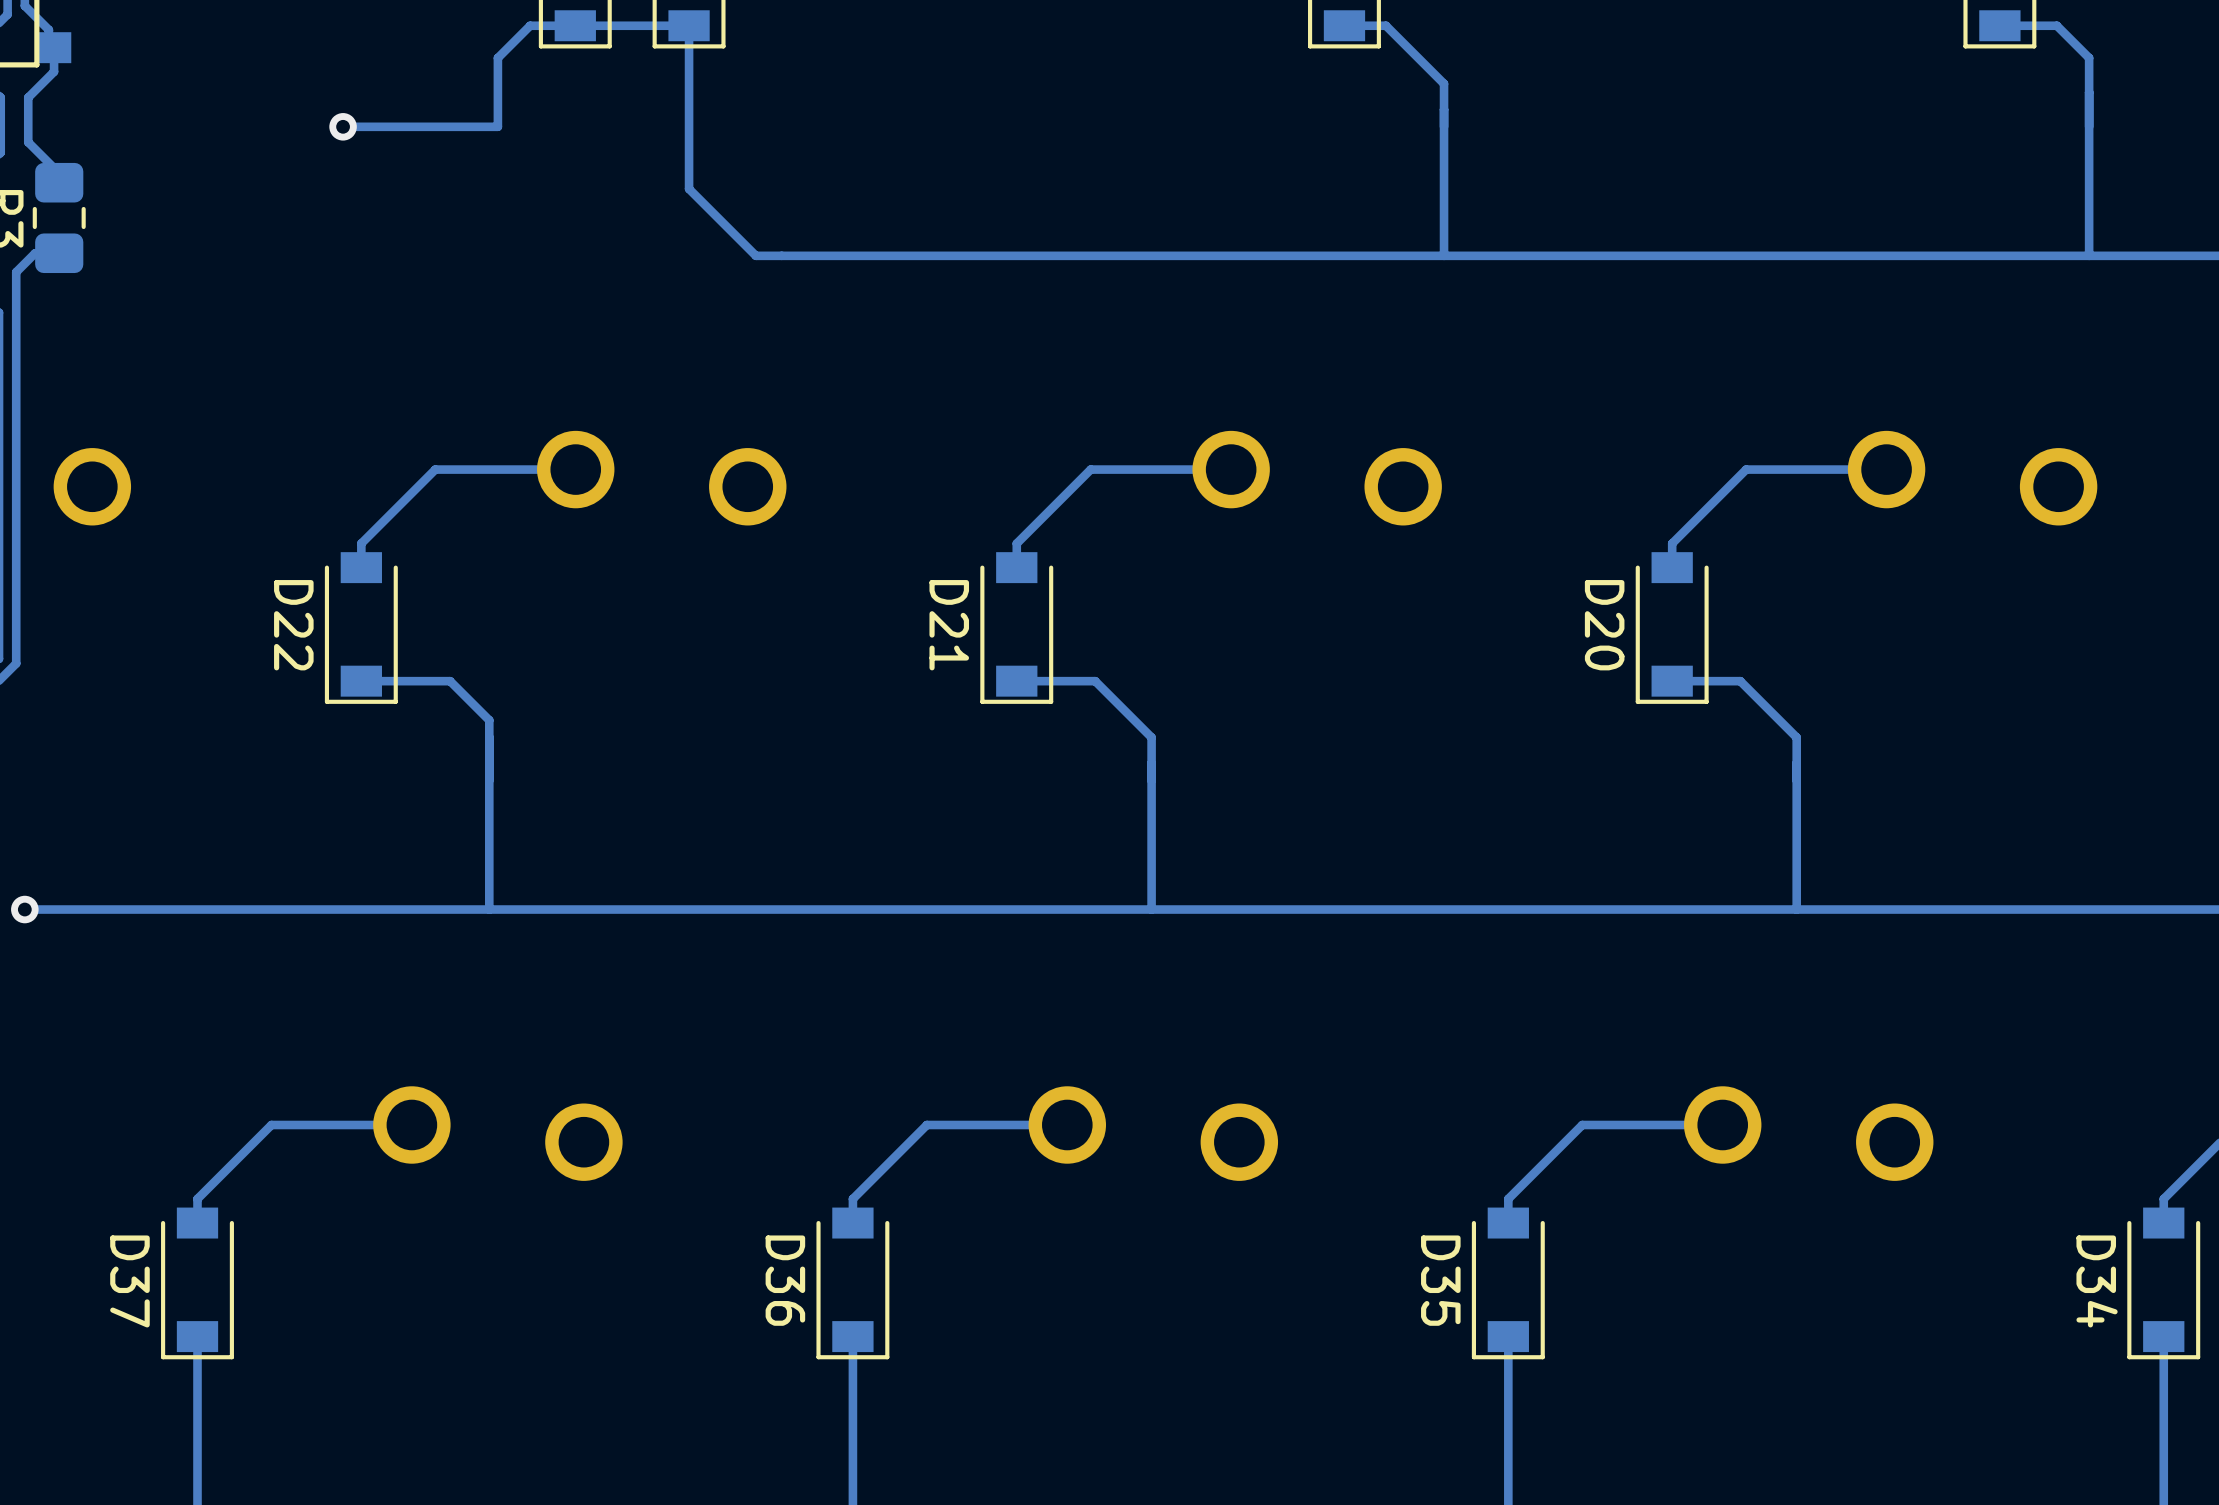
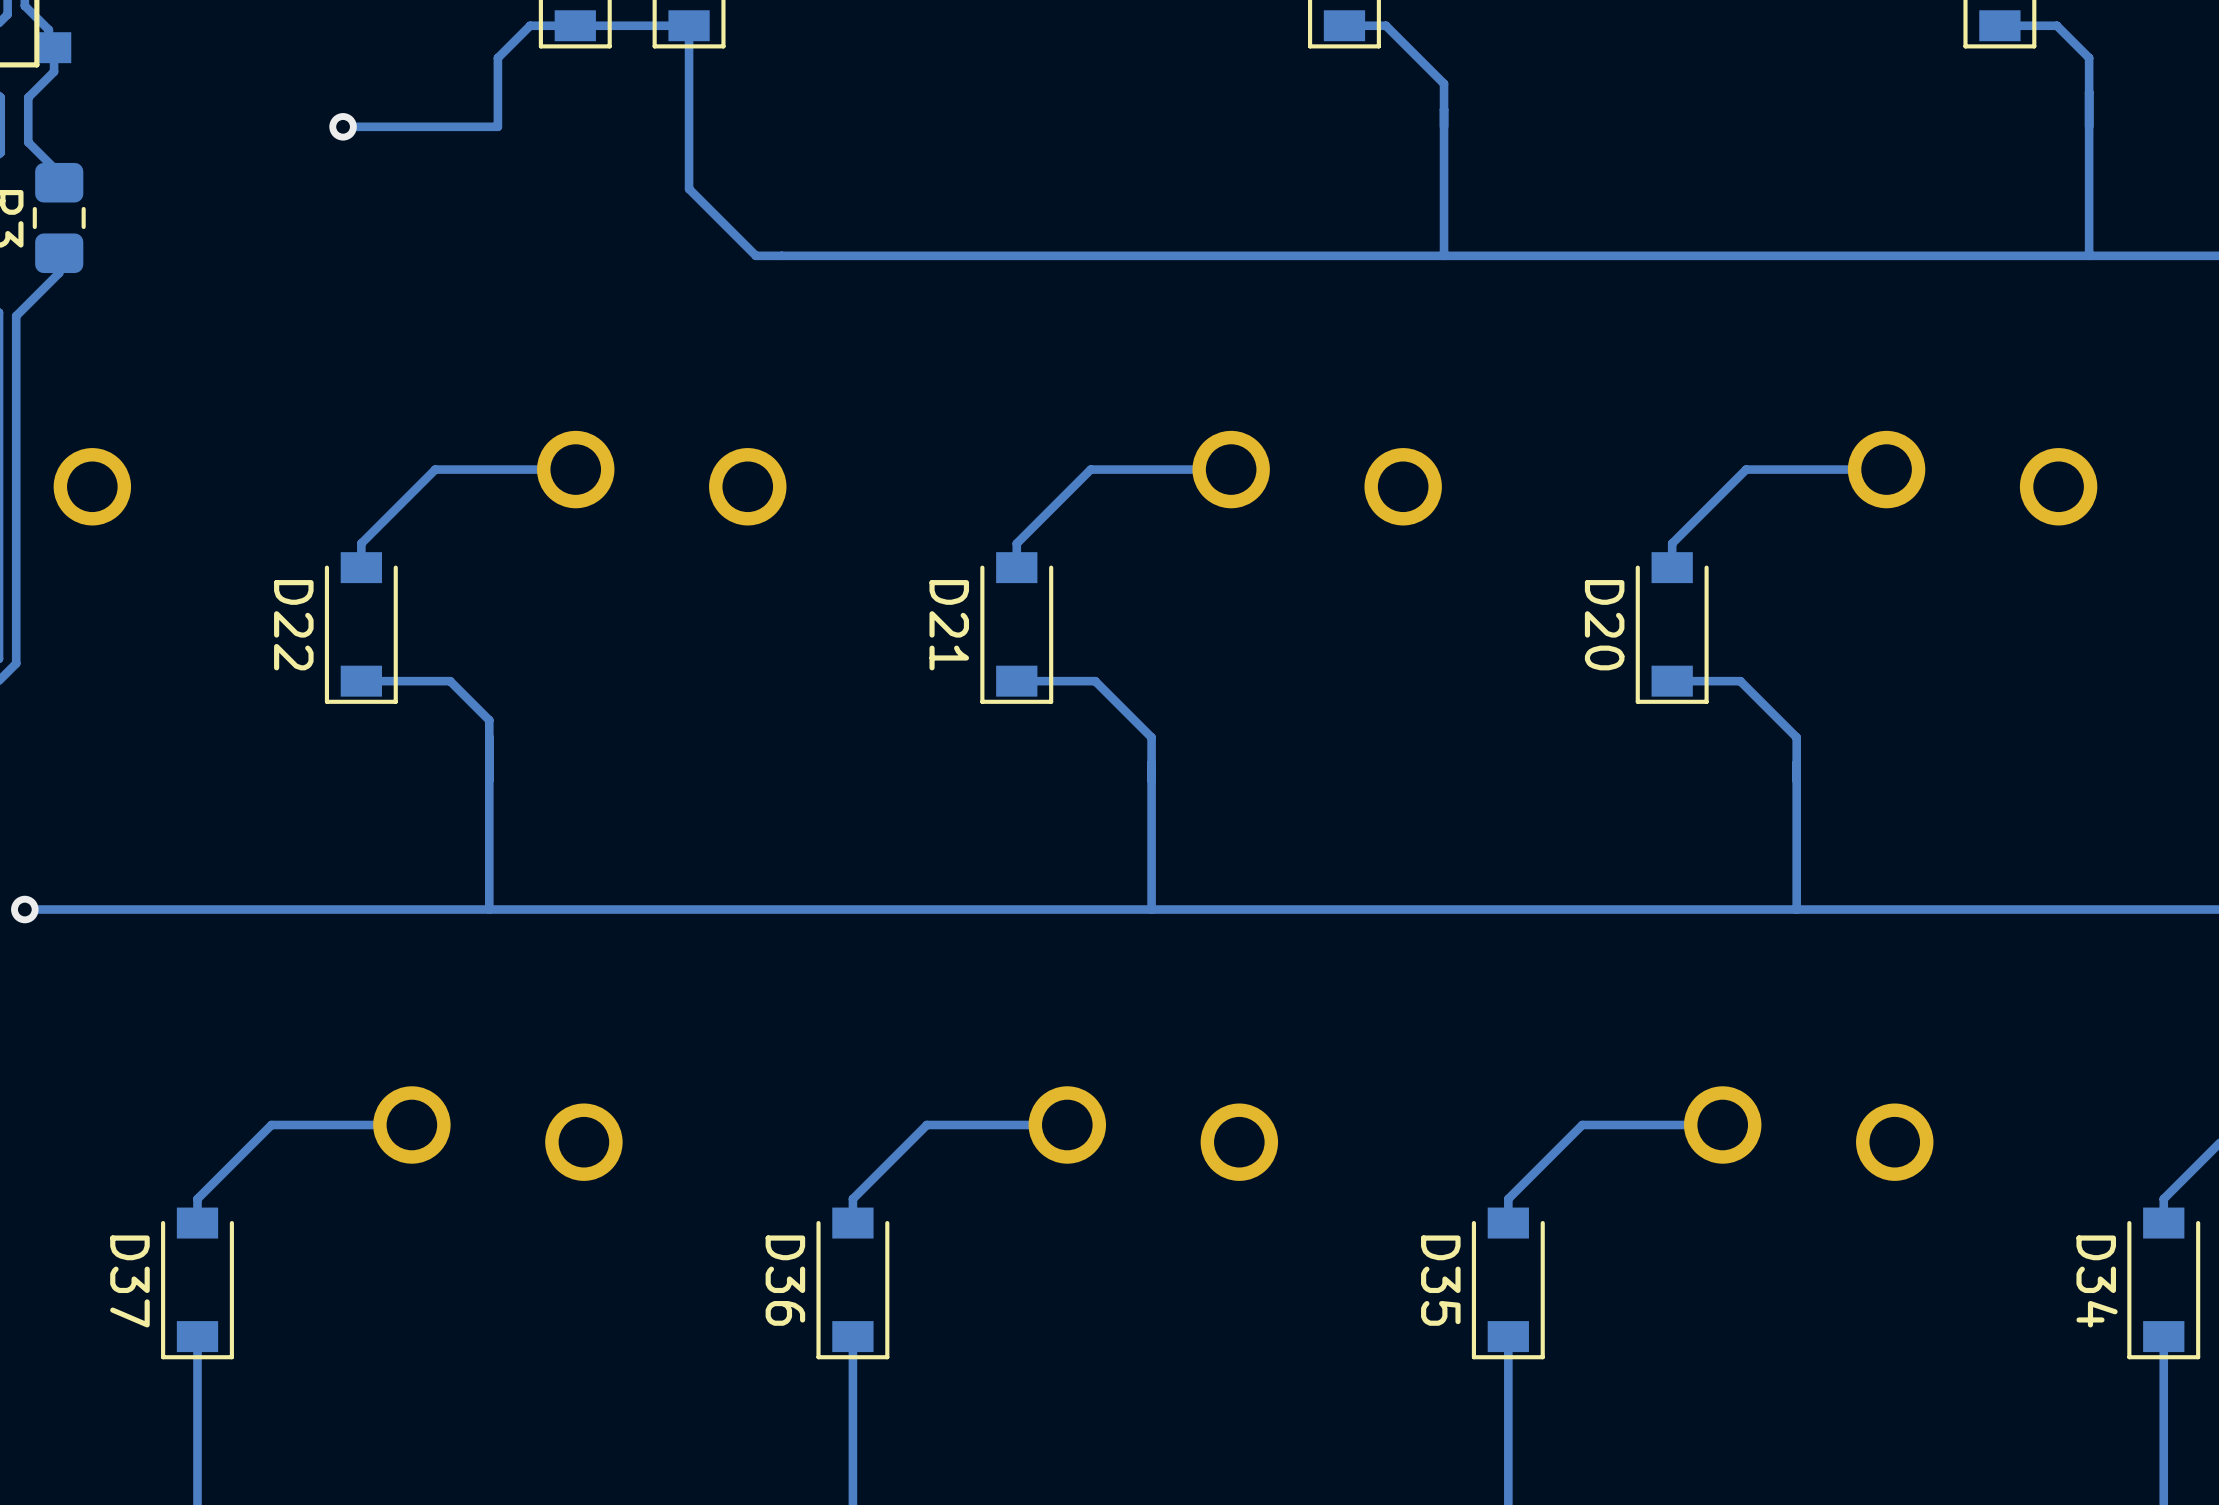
track: (59, 253) (35, 253) (16, 272) (16, 316) -> (59, 253) (59, 273) (16, 316)

